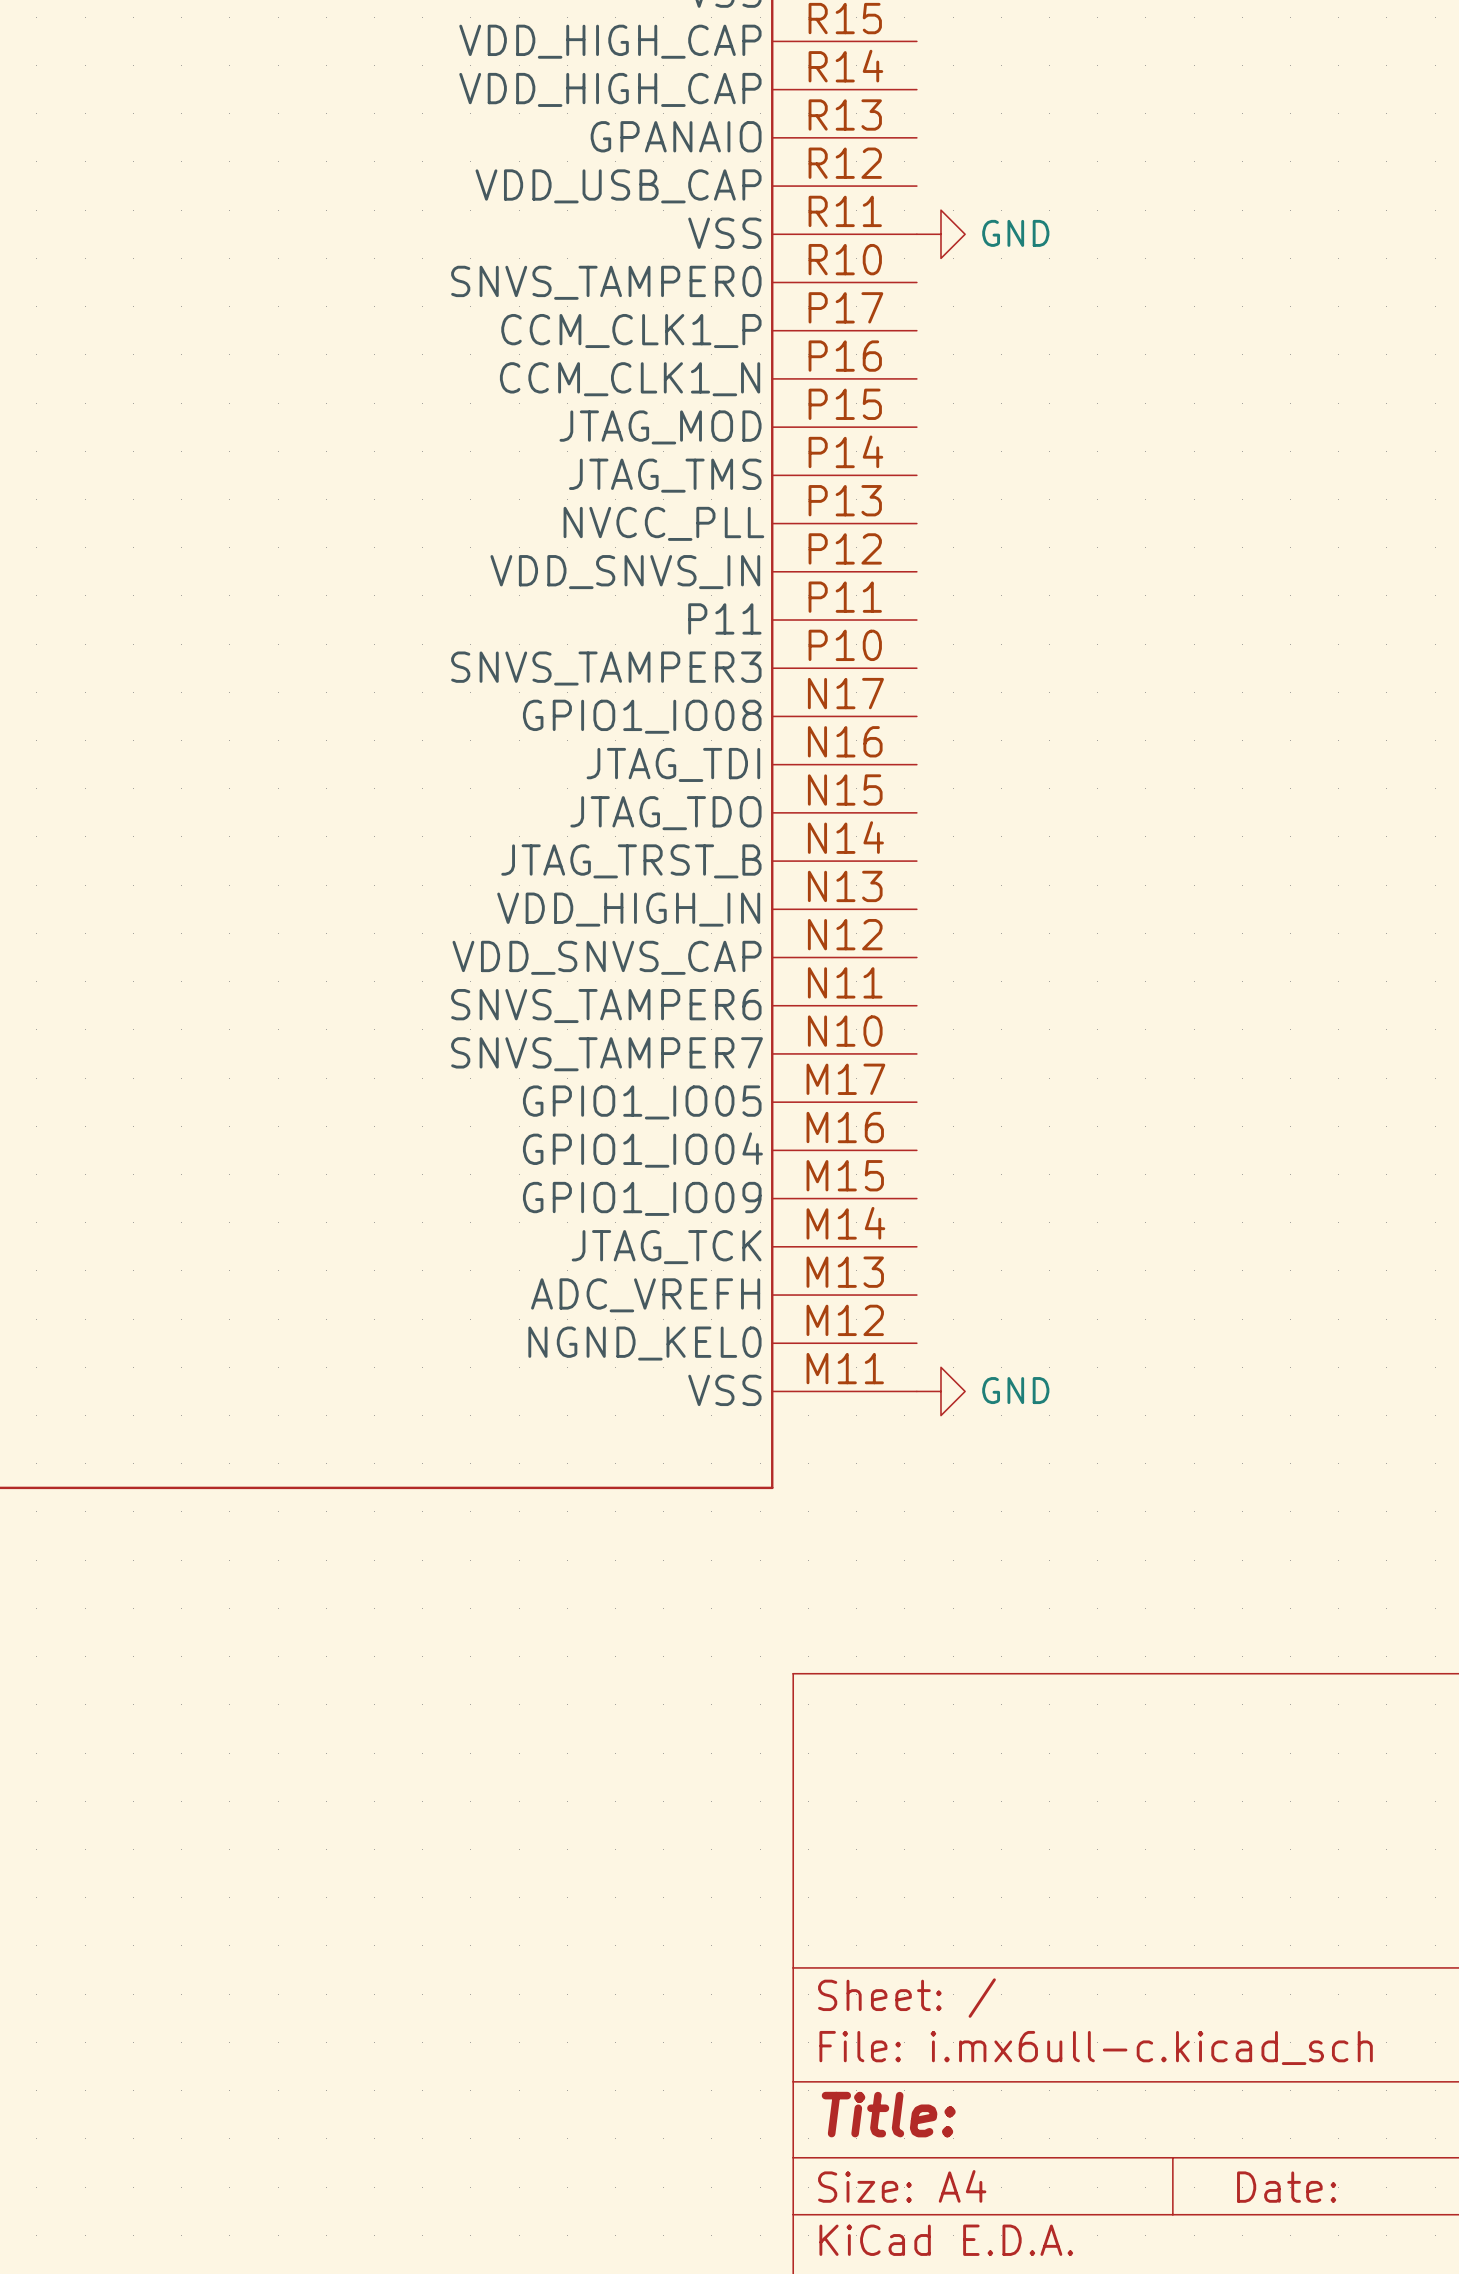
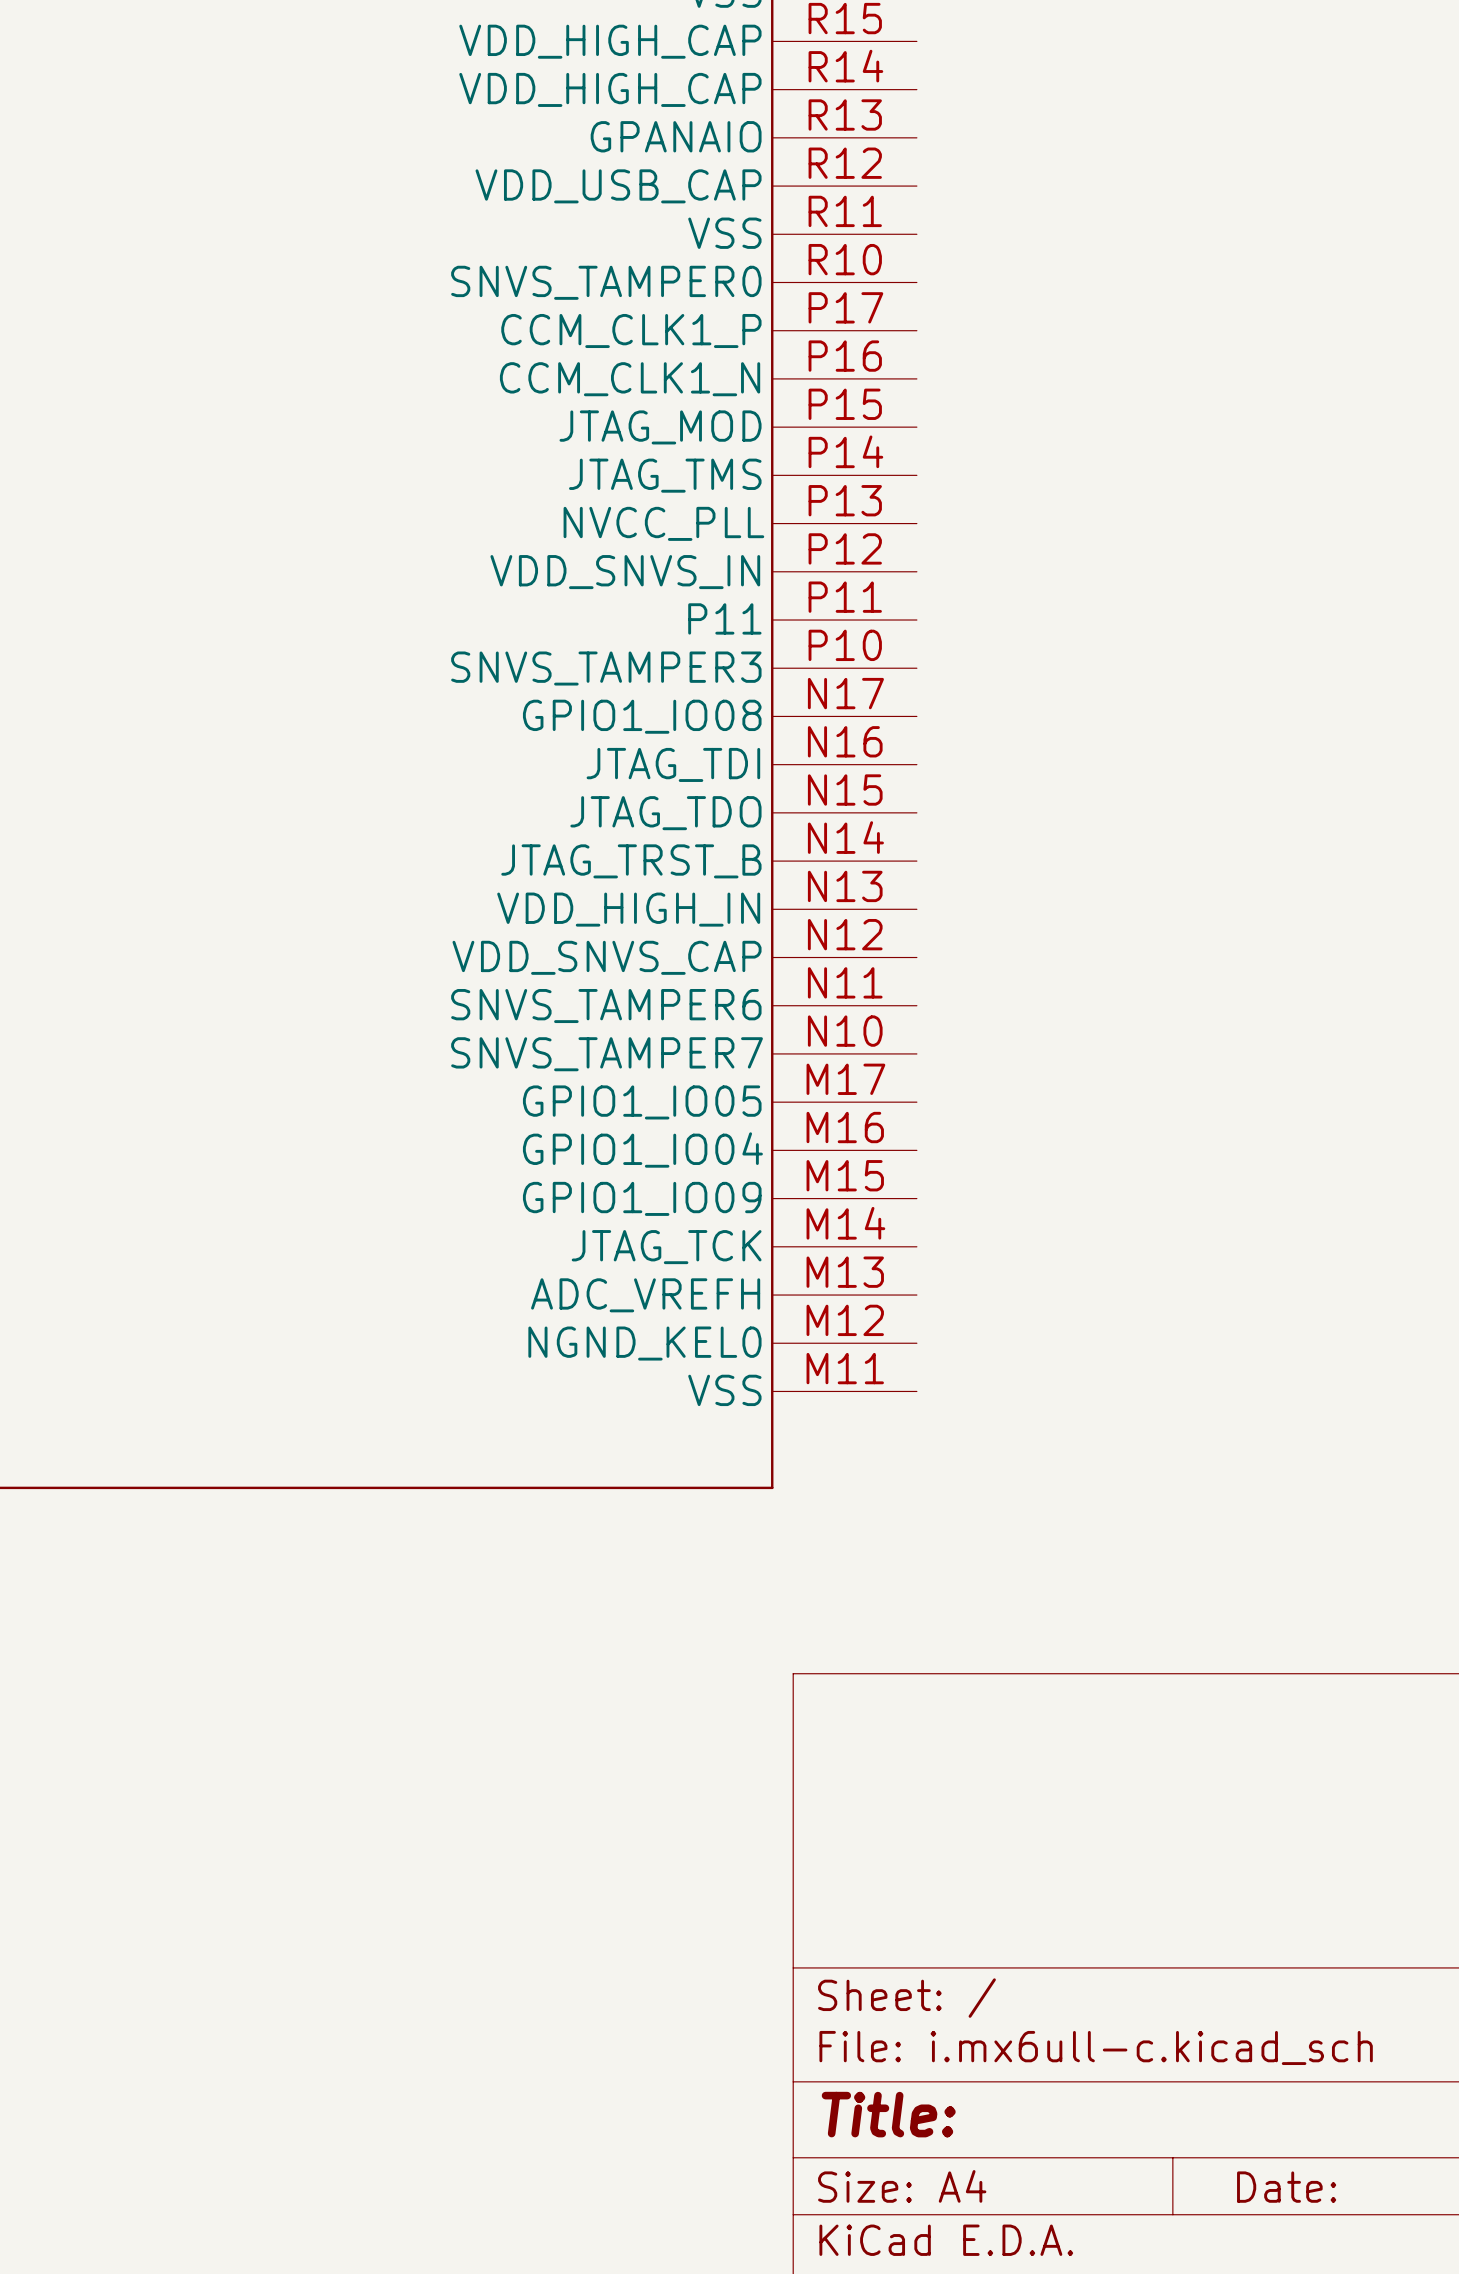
power symbol: GND (940, 234) -> none
power symbol: GND (940, 1391) -> none

